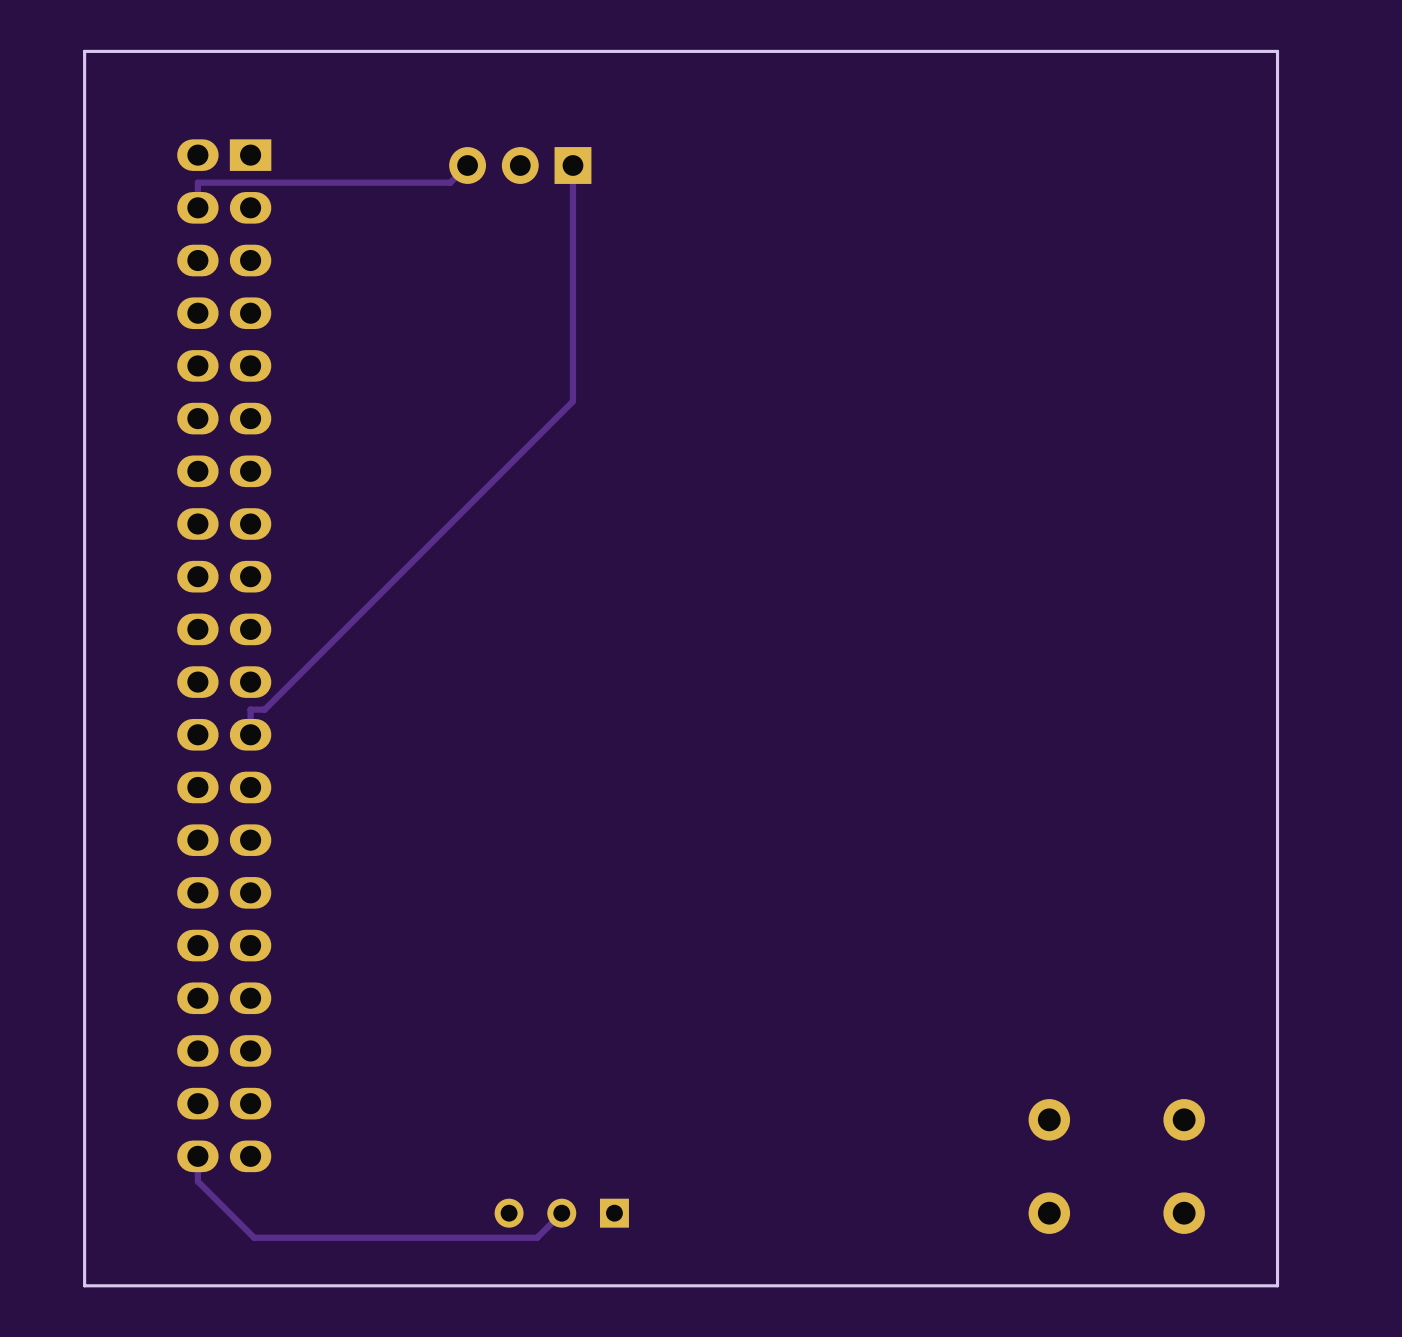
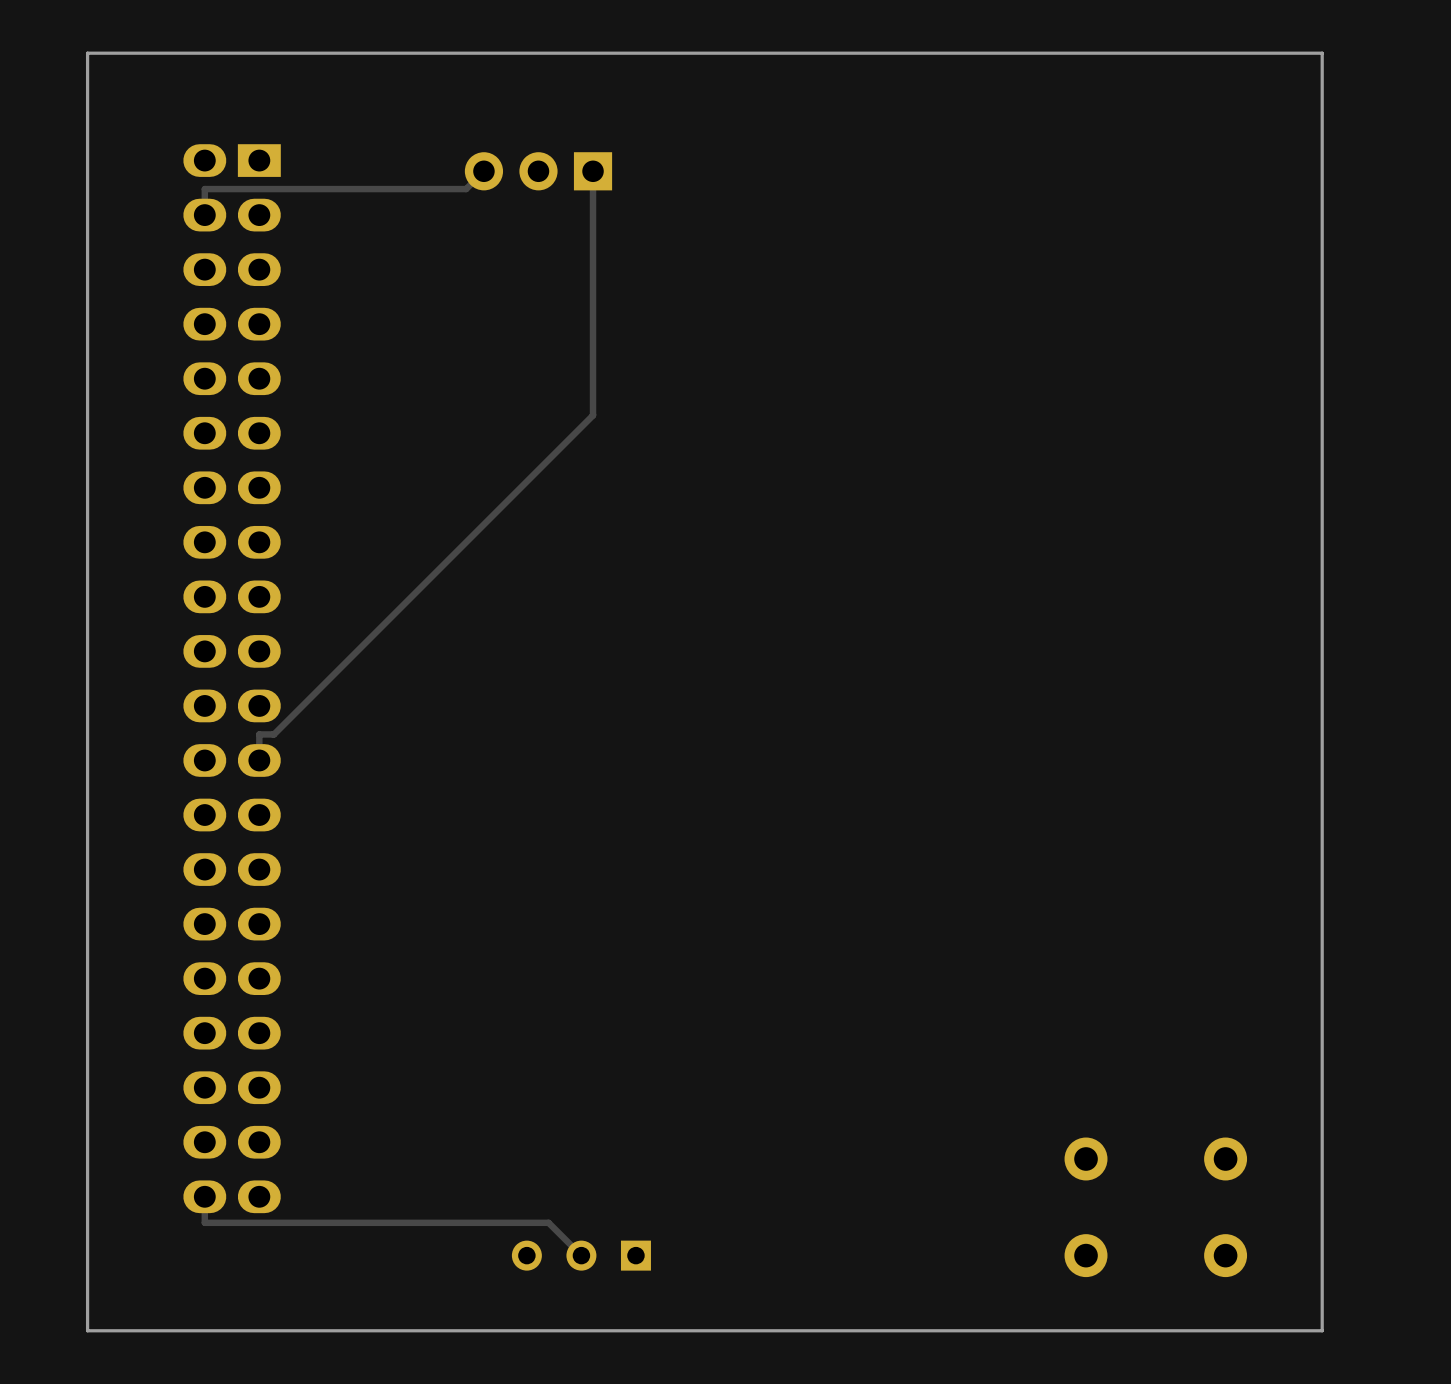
track: (197, 1181) (254, 1237) (537, 1237) (561, 1213) -> (204, 1222) (548, 1222) (581, 1255)

